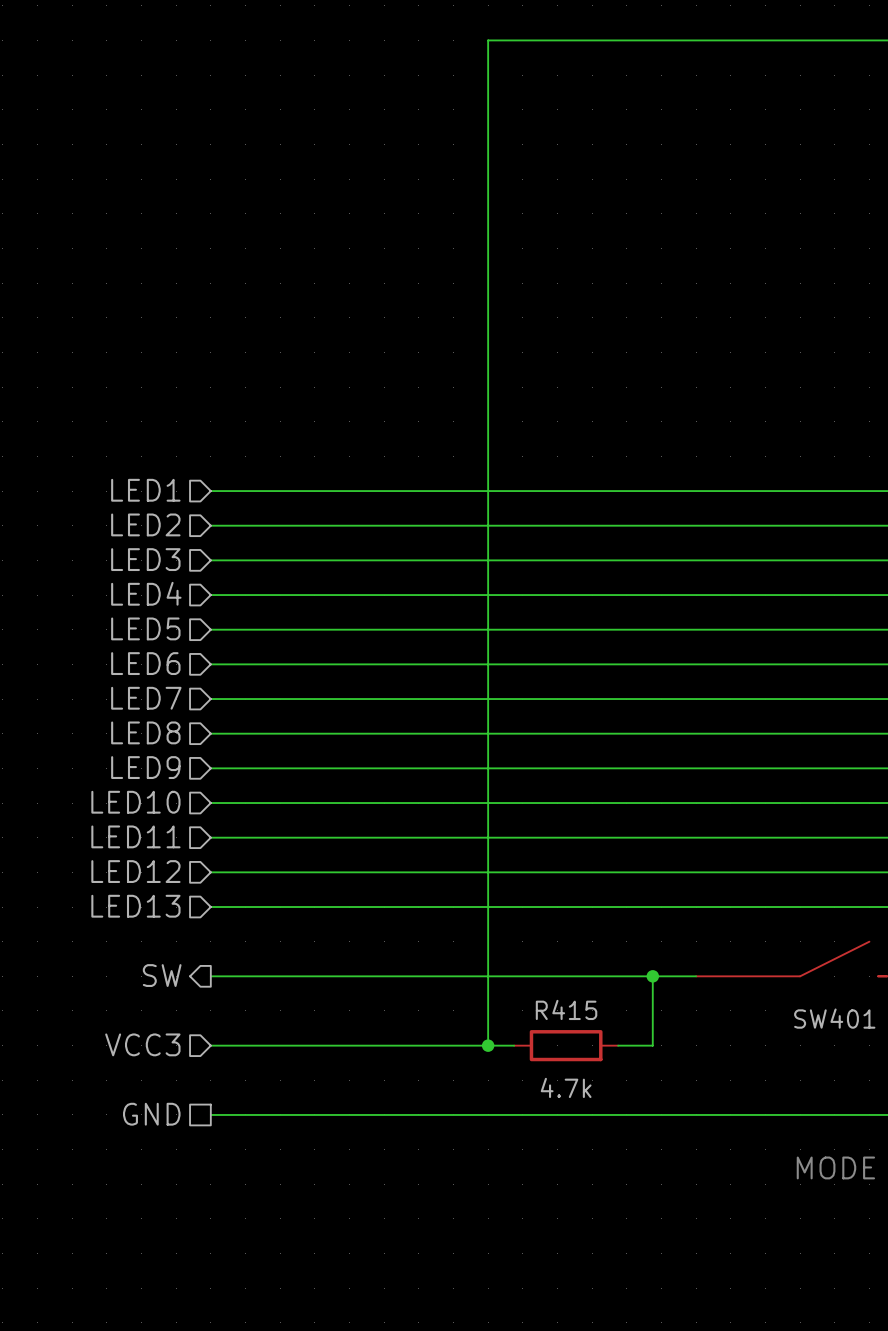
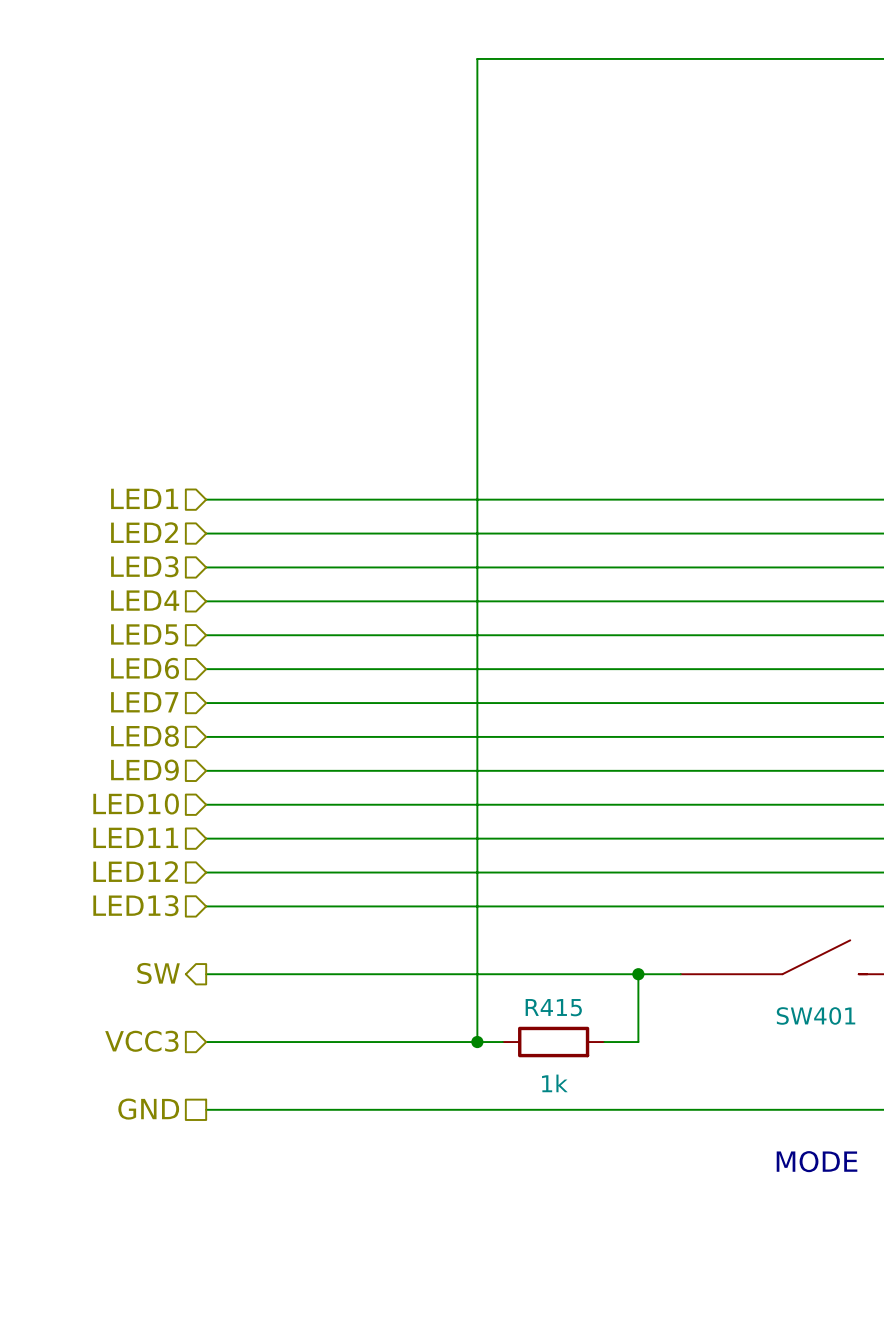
R415 value: 4.7k (566, 1087) -> 1k (554, 1083)

